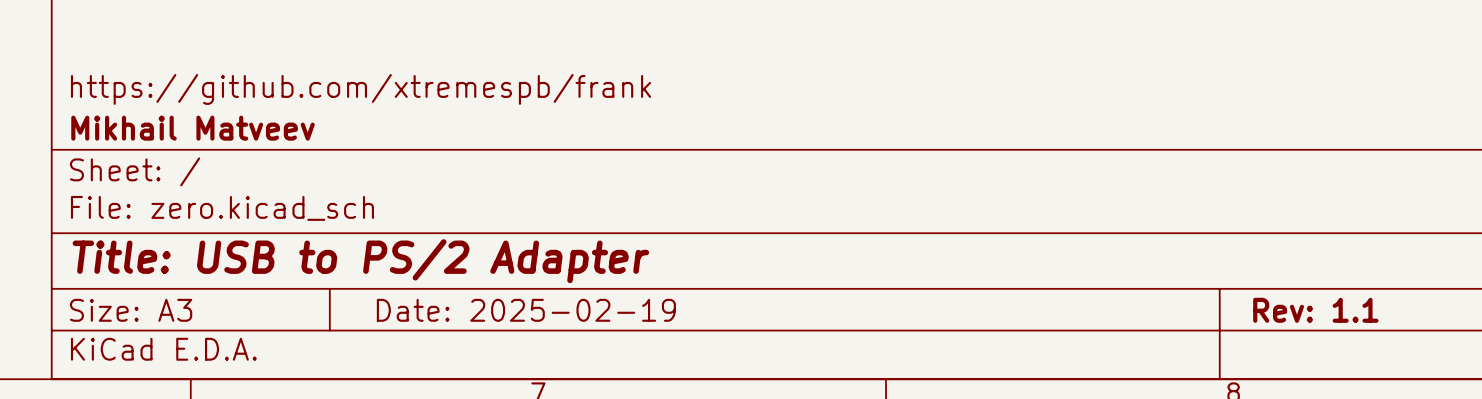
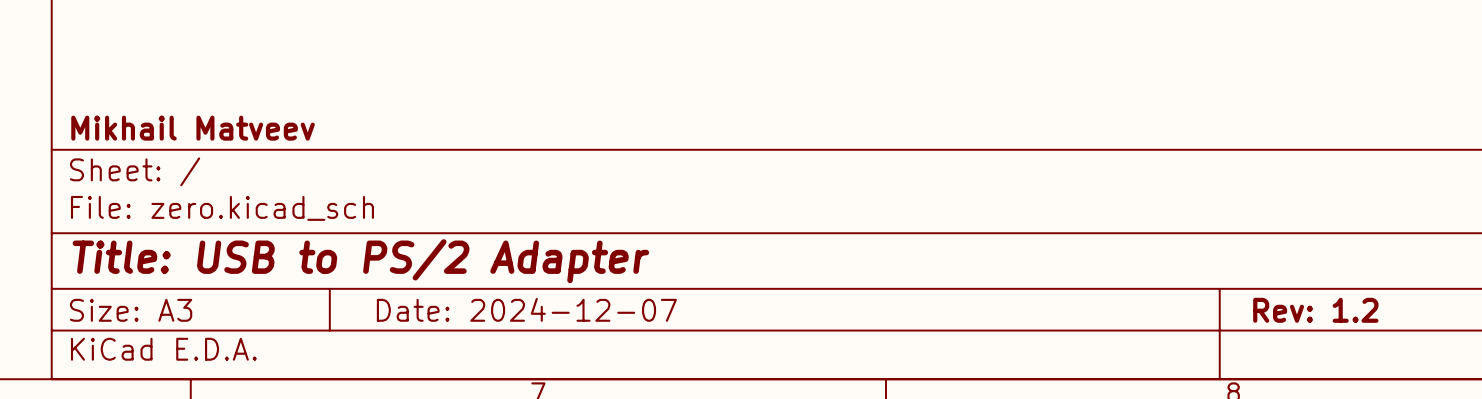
title block: https://github.com/xtremespb/frank (361, 89) -> none
title block: Date: 2025-02-19 (526, 310) -> Date: 2024-12-07 (526, 309)
title block: Rev: 1.1 (1315, 310) -> Rev: 1.2 (1315, 310)

